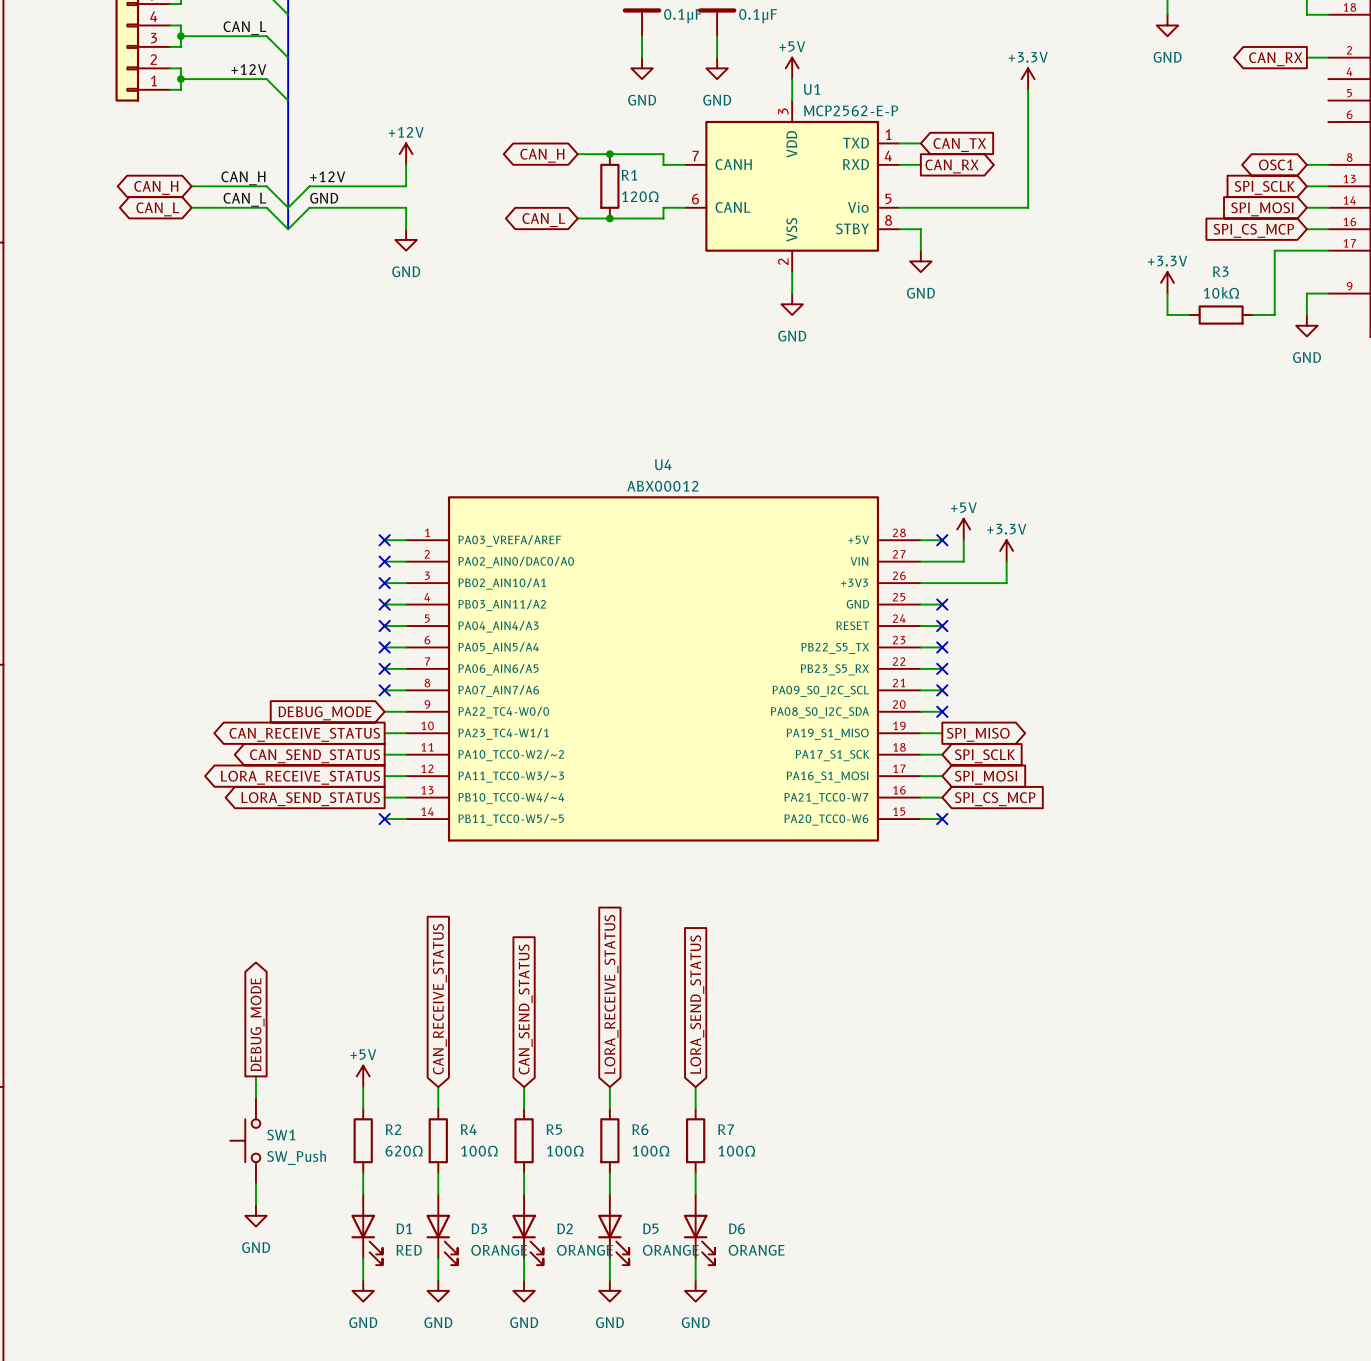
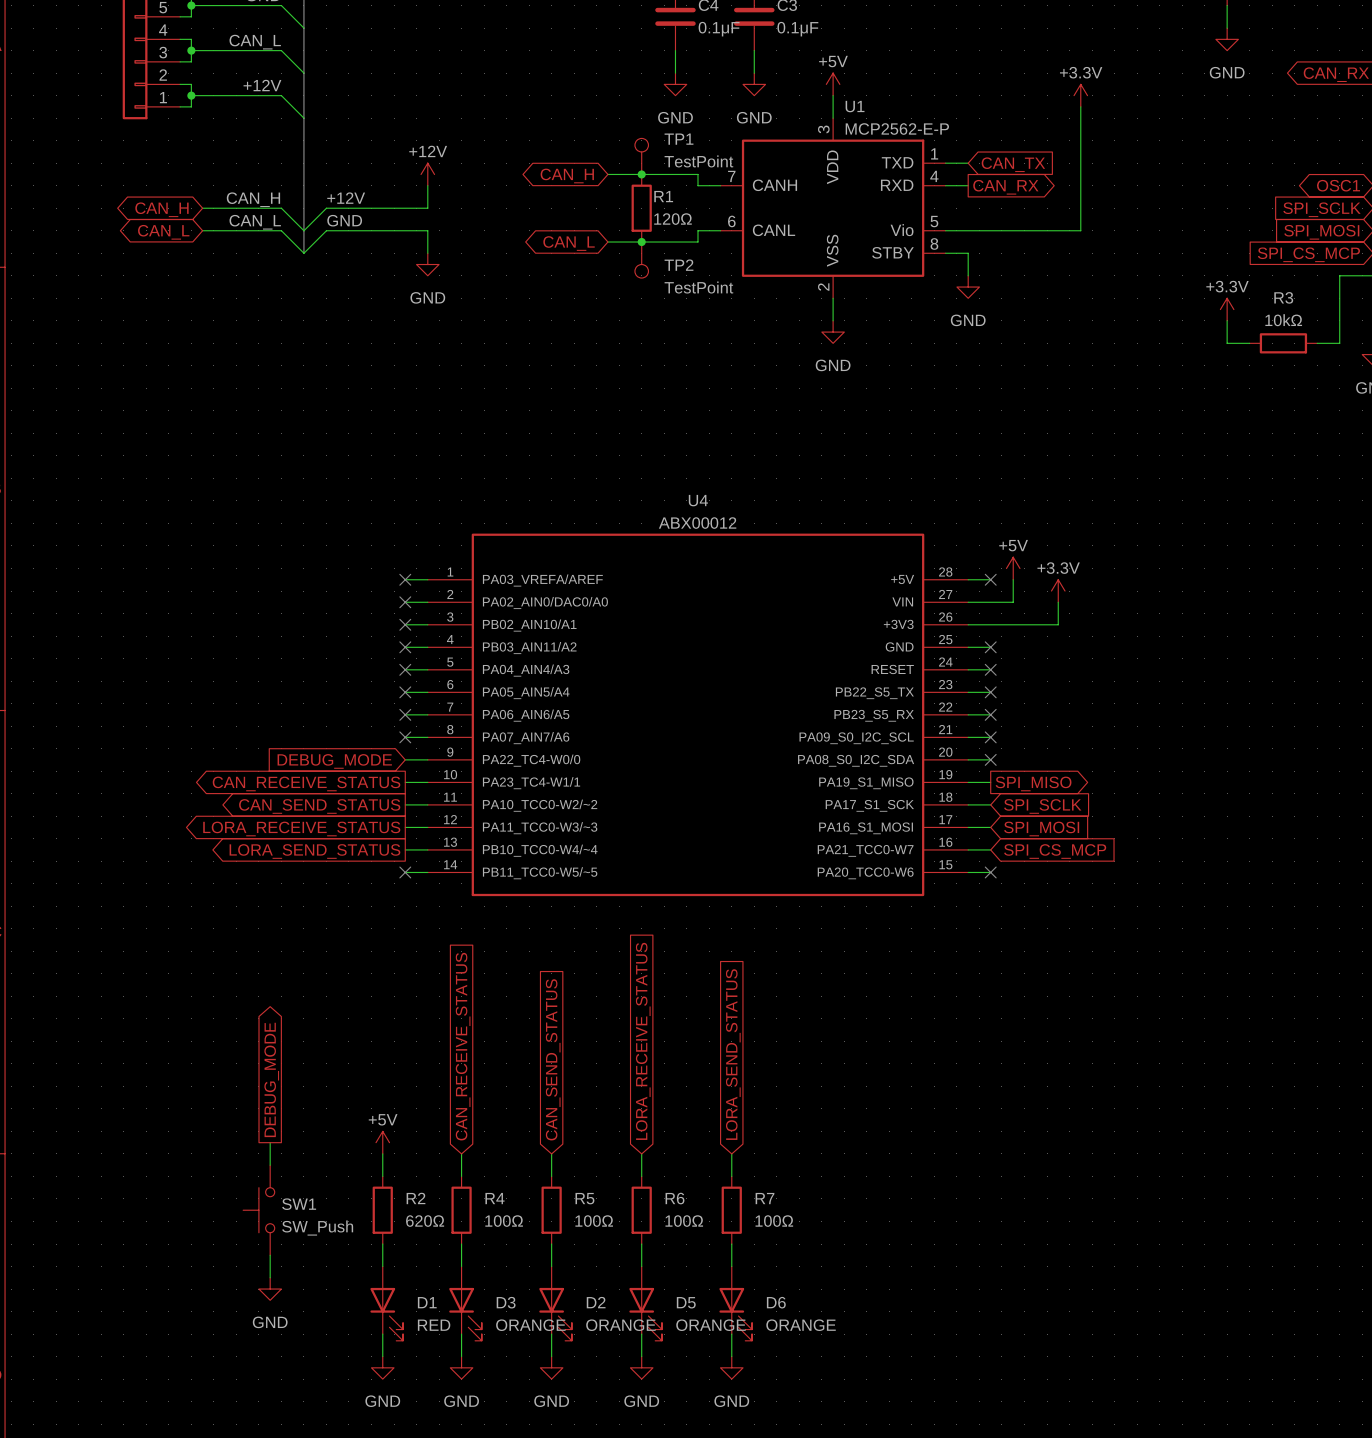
TP1: none -> TestPoint (641, 156)
TP2: none -> TestPoint (641, 260)

